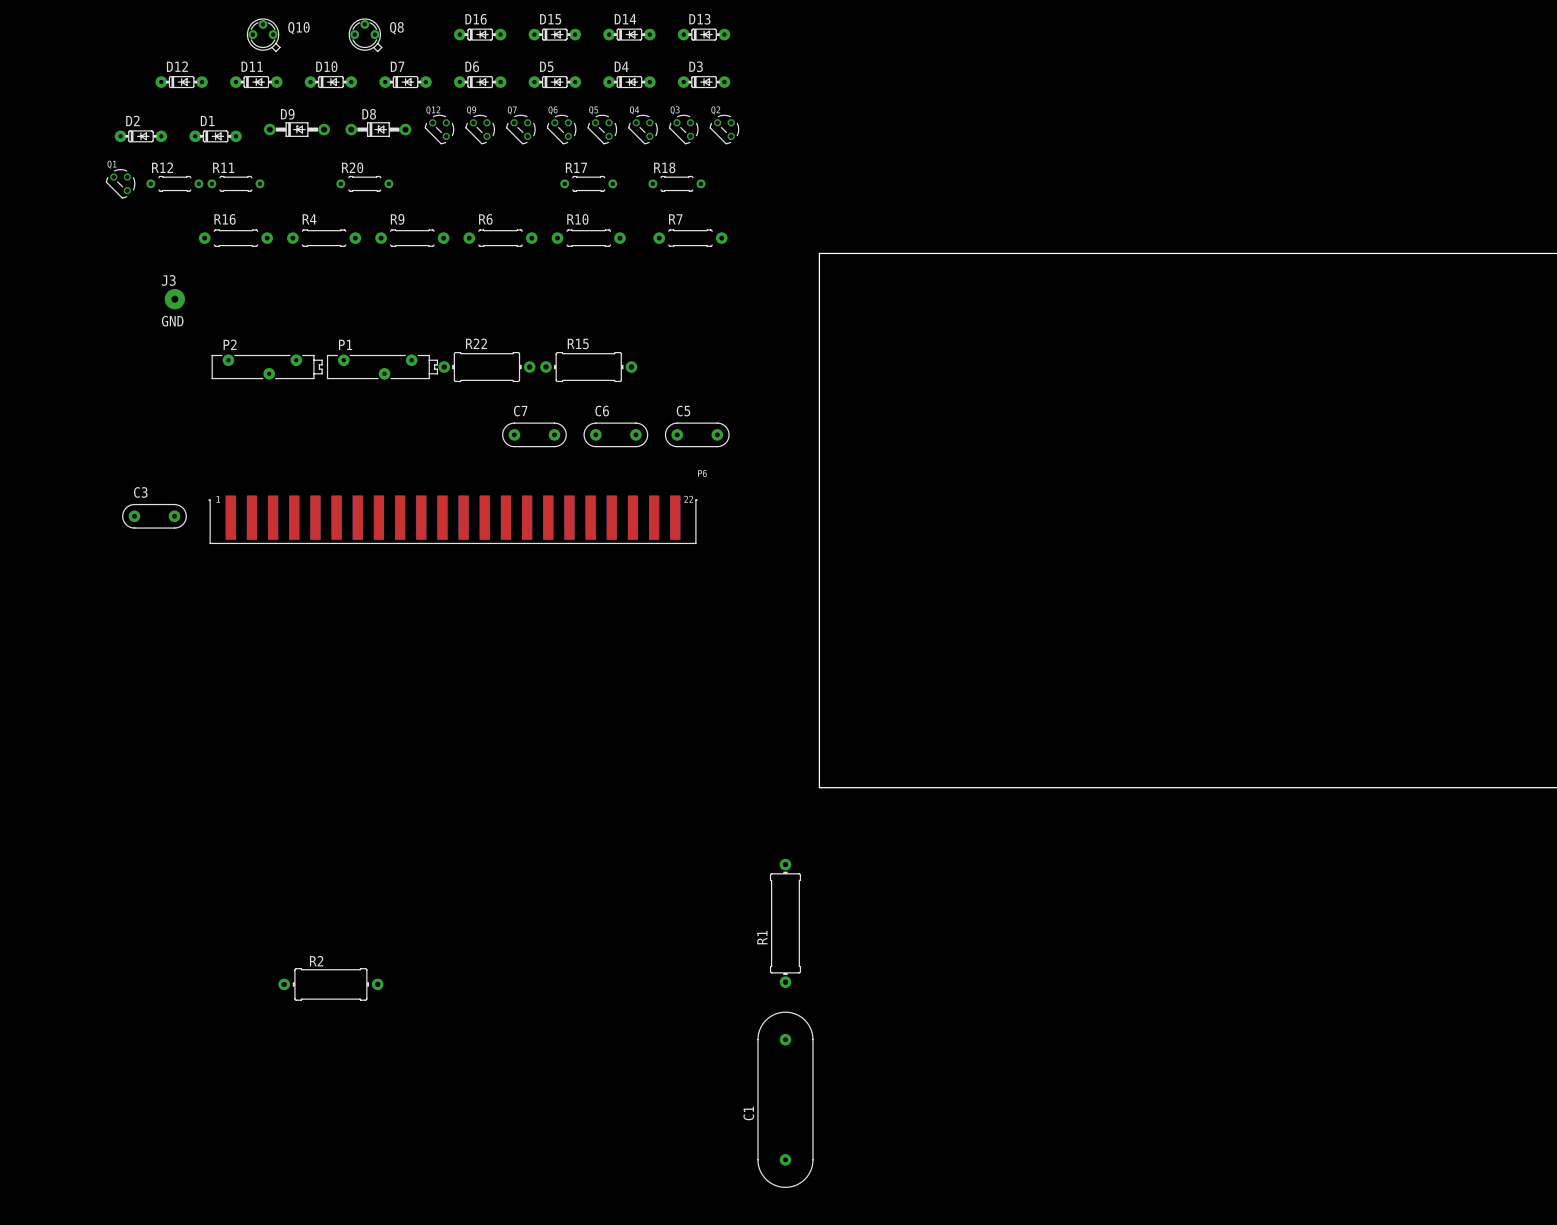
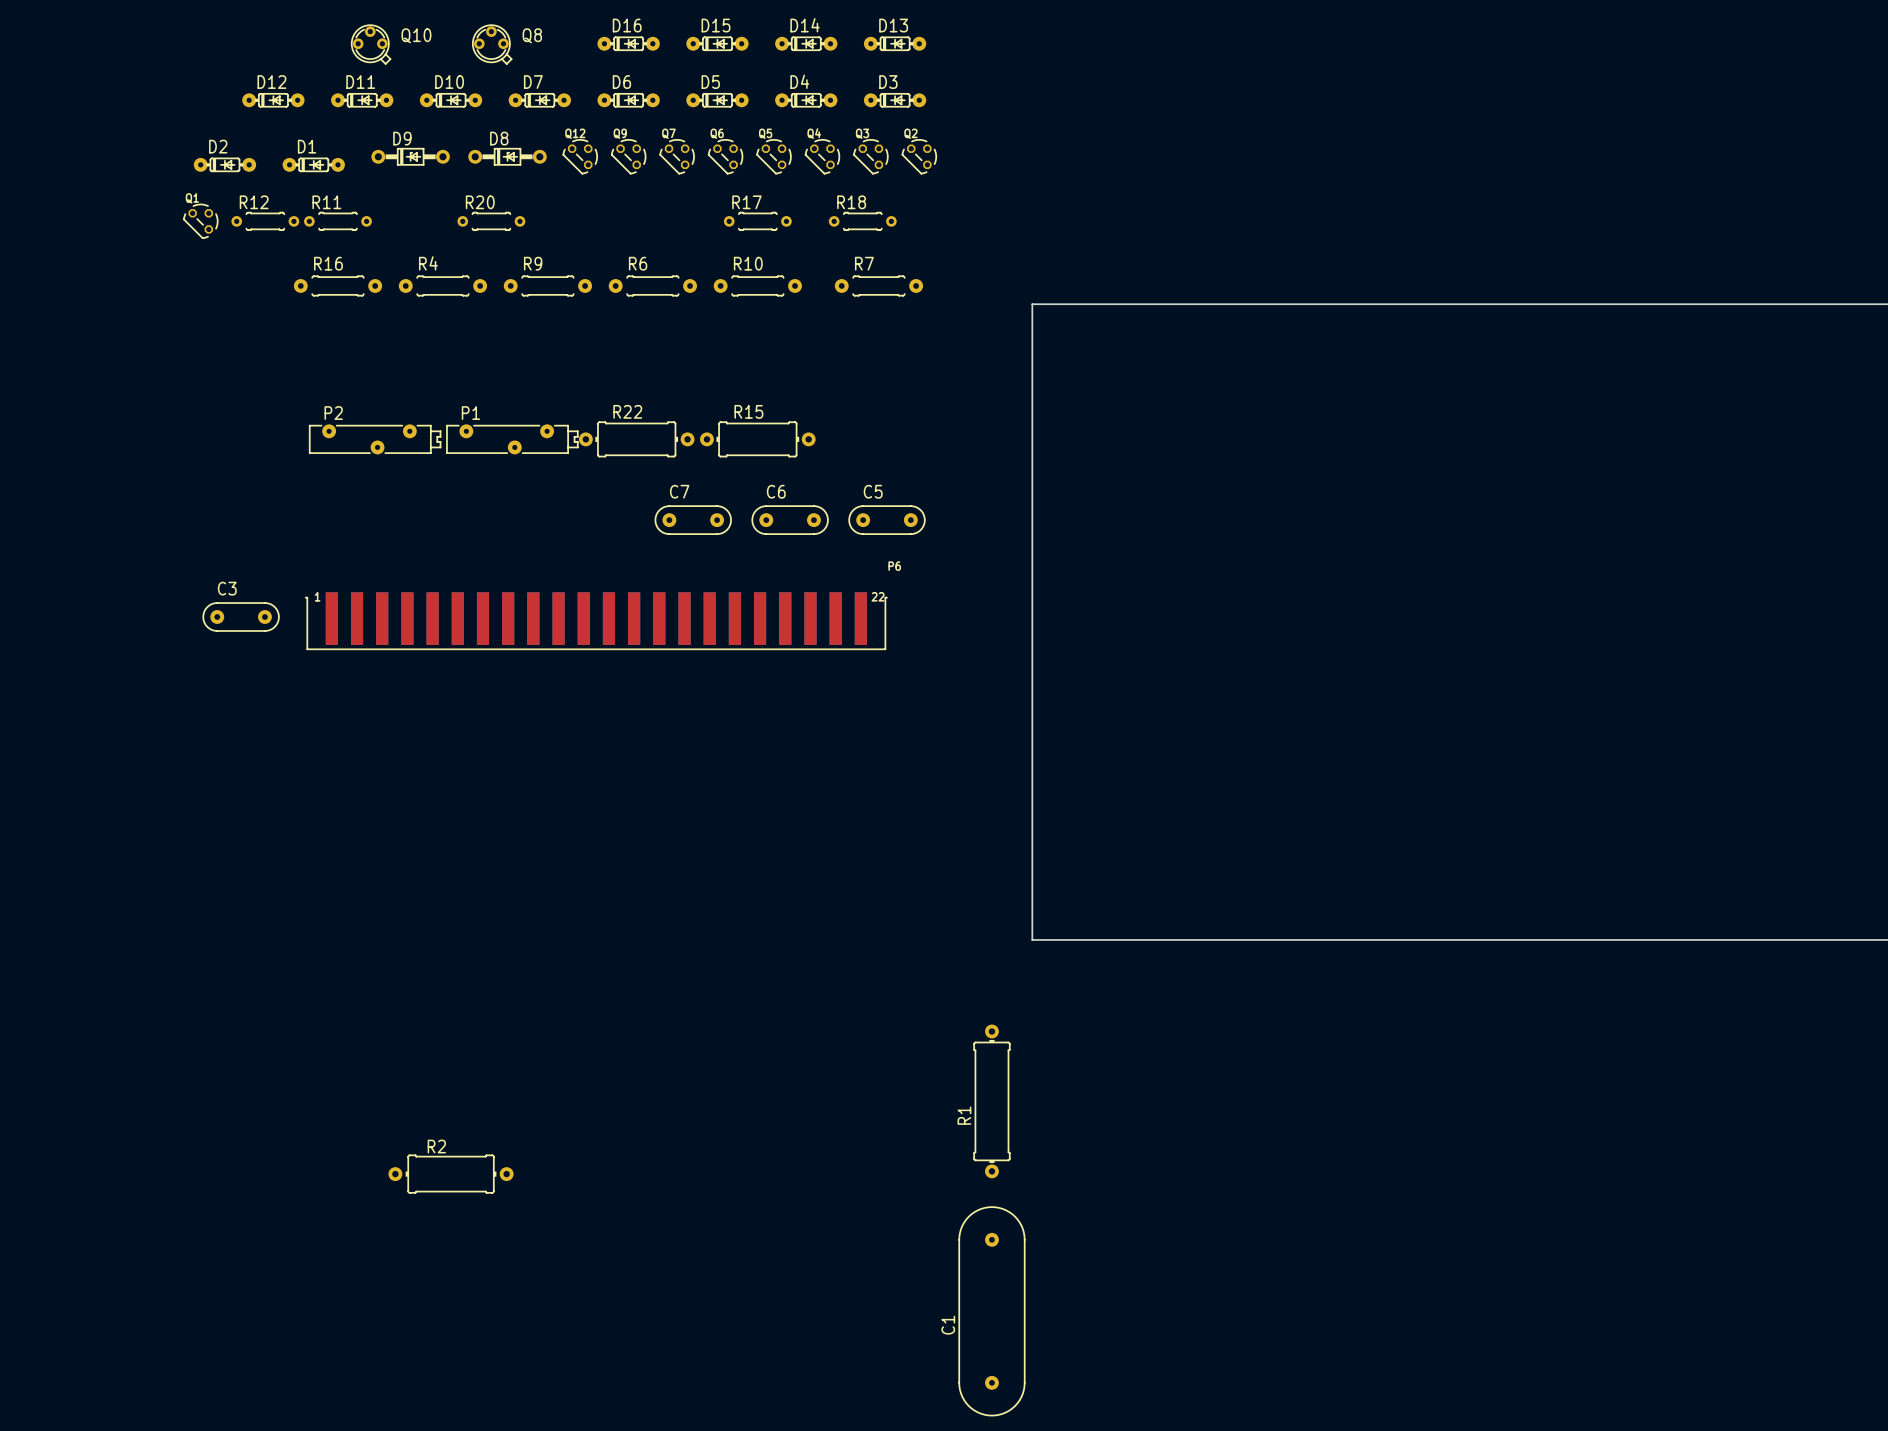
J3: GND (174, 299) -> none

